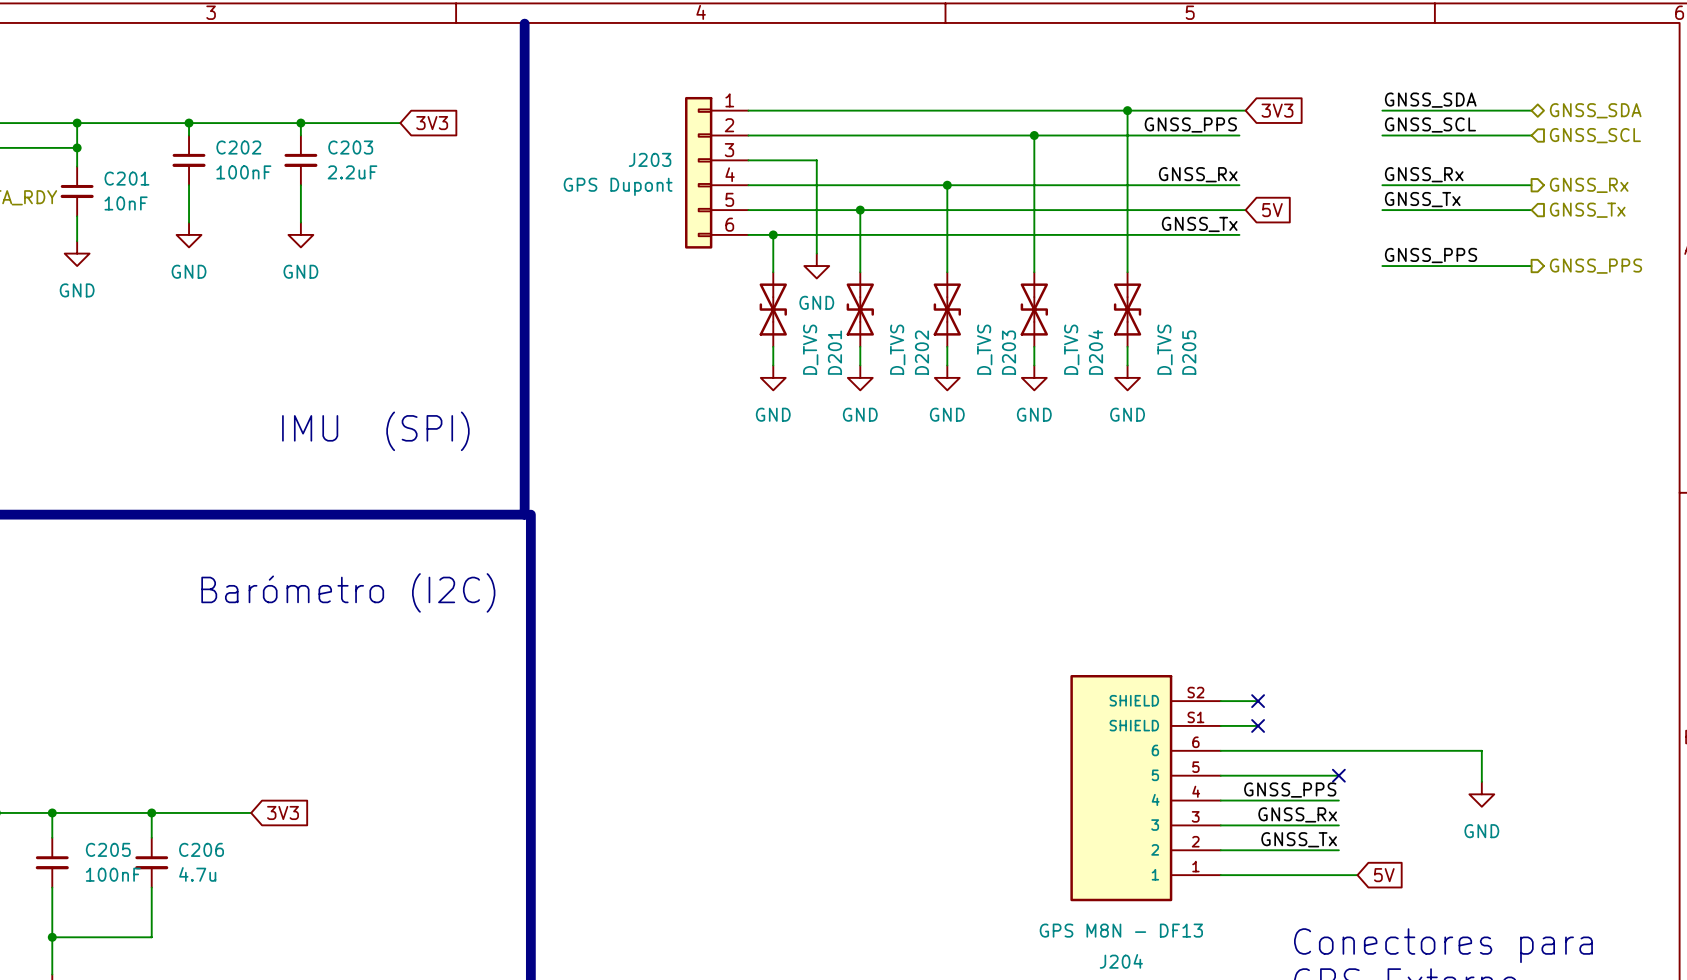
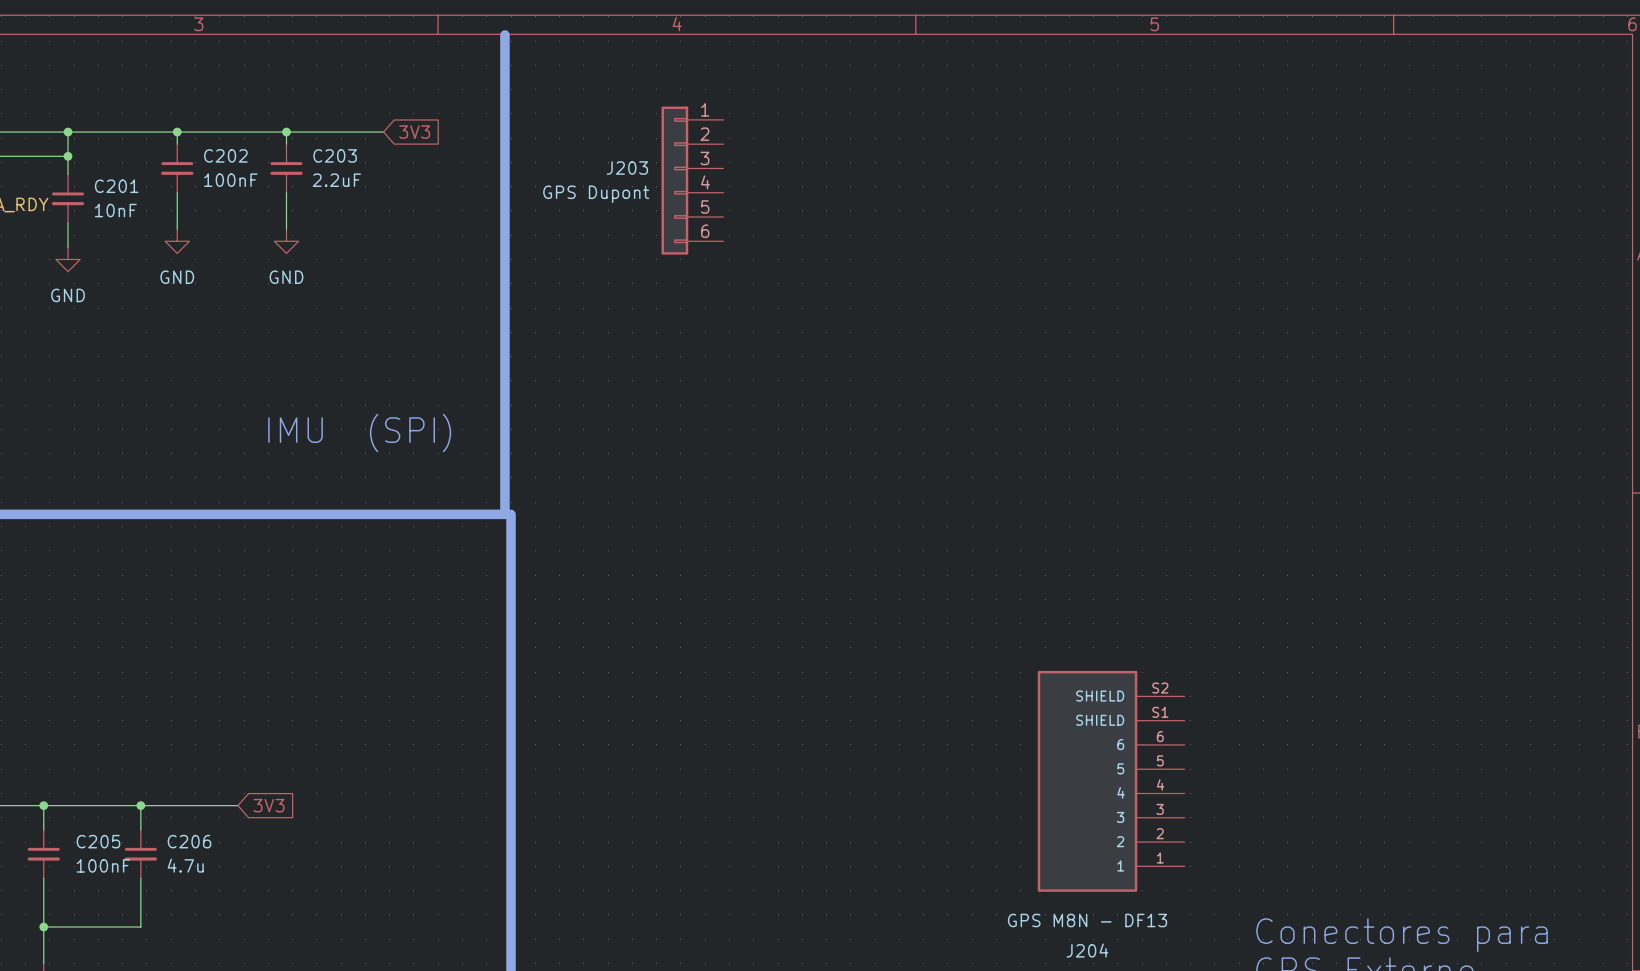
label: GNSS_SDA (1430, 100) -> none
wire: (748, 110) (1245, 110) -> none
wire: (1127, 110) (1127, 272) -> none
junction: (1127, 110) -> none
global label: 3V3 (1277, 110) -> none
wire: (1382, 110) (1531, 110) -> none
hierarchical label: GNSS_SDA (1595, 110) -> none
label: GNSS_PPS (1190, 124) -> none
label: GNSS_SCL (1430, 124) -> none
wire: (748, 135) (1239, 135) -> none
wire: (1034, 135) (1034, 272) -> none
junction: (1034, 135) -> none
wire: (1382, 135) (1531, 135) -> none
hierarchical label: GNSS_SCL (1595, 135) -> none
wire: (748, 160) (816, 160) (816, 253) -> none
label: GNSS_Rx (1198, 174) -> none
label: GNSS_Rx (1424, 174) -> none
wire: (748, 185) (1239, 185) -> none
wire: (947, 185) (947, 272) -> none
junction: (947, 185) -> none
wire: (1382, 185) (1531, 185) -> none
hierarchical label: GNSS_Rx (1589, 185) -> none
label: GNSS_Tx (1422, 199) -> none
wire: (748, 210) (1245, 210) -> none
wire: (860, 210) (860, 272) -> none
junction: (860, 210) -> none
global label: 5V (1272, 210) -> none
wire: (1382, 210) (1531, 210) -> none
hierarchical label: GNSS_Tx (1587, 210) -> none
label: GNSS_Tx (1199, 224) -> none
wire: (748, 234) (1239, 234) -> none
wire: (773, 234) (773, 272) -> none
junction: (773, 234) -> none
label: GNSS_PPS (1431, 255) -> none
power symbol: GND (816, 266) -> none
wire: (1382, 266) (1531, 266) -> none
hierarchical label: GNSS_PPS (1595, 266) -> none
D201: D_TVS (773, 309) -> none
D202: D_TVS (860, 309) -> none
D203: D_TVS (947, 309) -> none
D204: D_TVS (1034, 309) -> none
D205: D_TVS (1127, 309) -> none
wire: (773, 346) (773, 365) -> none
wire: (860, 346) (860, 365) -> none
wire: (947, 346) (947, 365) -> none
wire: (1034, 346) (1034, 365) -> none
wire: (1127, 346) (1127, 365) -> none
power symbol: GND (773, 377) -> none
power symbol: GND (860, 377) -> none
power symbol: GND (947, 377) -> none
power symbol: GND (1034, 377) -> none
power symbol: GND (1127, 377) -> none
text: Barómetro (I2C) (348, 592) -> none
wire: (1220, 701) (1258, 701) -> none
no-connect mark: (1258, 701) -> none
wire: (1220, 725) (1258, 725) -> none
no-connect mark: (1258, 725) -> none
wire: (1220, 750) (1481, 750) (1481, 781) -> none
wire: (1220, 775) (1338, 775) -> none
no-connect mark: (1338, 775) -> none
label: GNSS_PPS (1290, 790) -> none
power symbol: GND (1481, 794) -> none
wire: (1220, 800) (1338, 800) -> none
label: GNSS_Rx (1297, 814) -> none
wire: (1220, 825) (1338, 825) -> none
label: GNSS_Tx (1299, 839) -> none
wire: (1220, 850) (1338, 850) -> none
wire: (1220, 875) (1357, 875) -> none
global label: 5V (1384, 875) -> none

